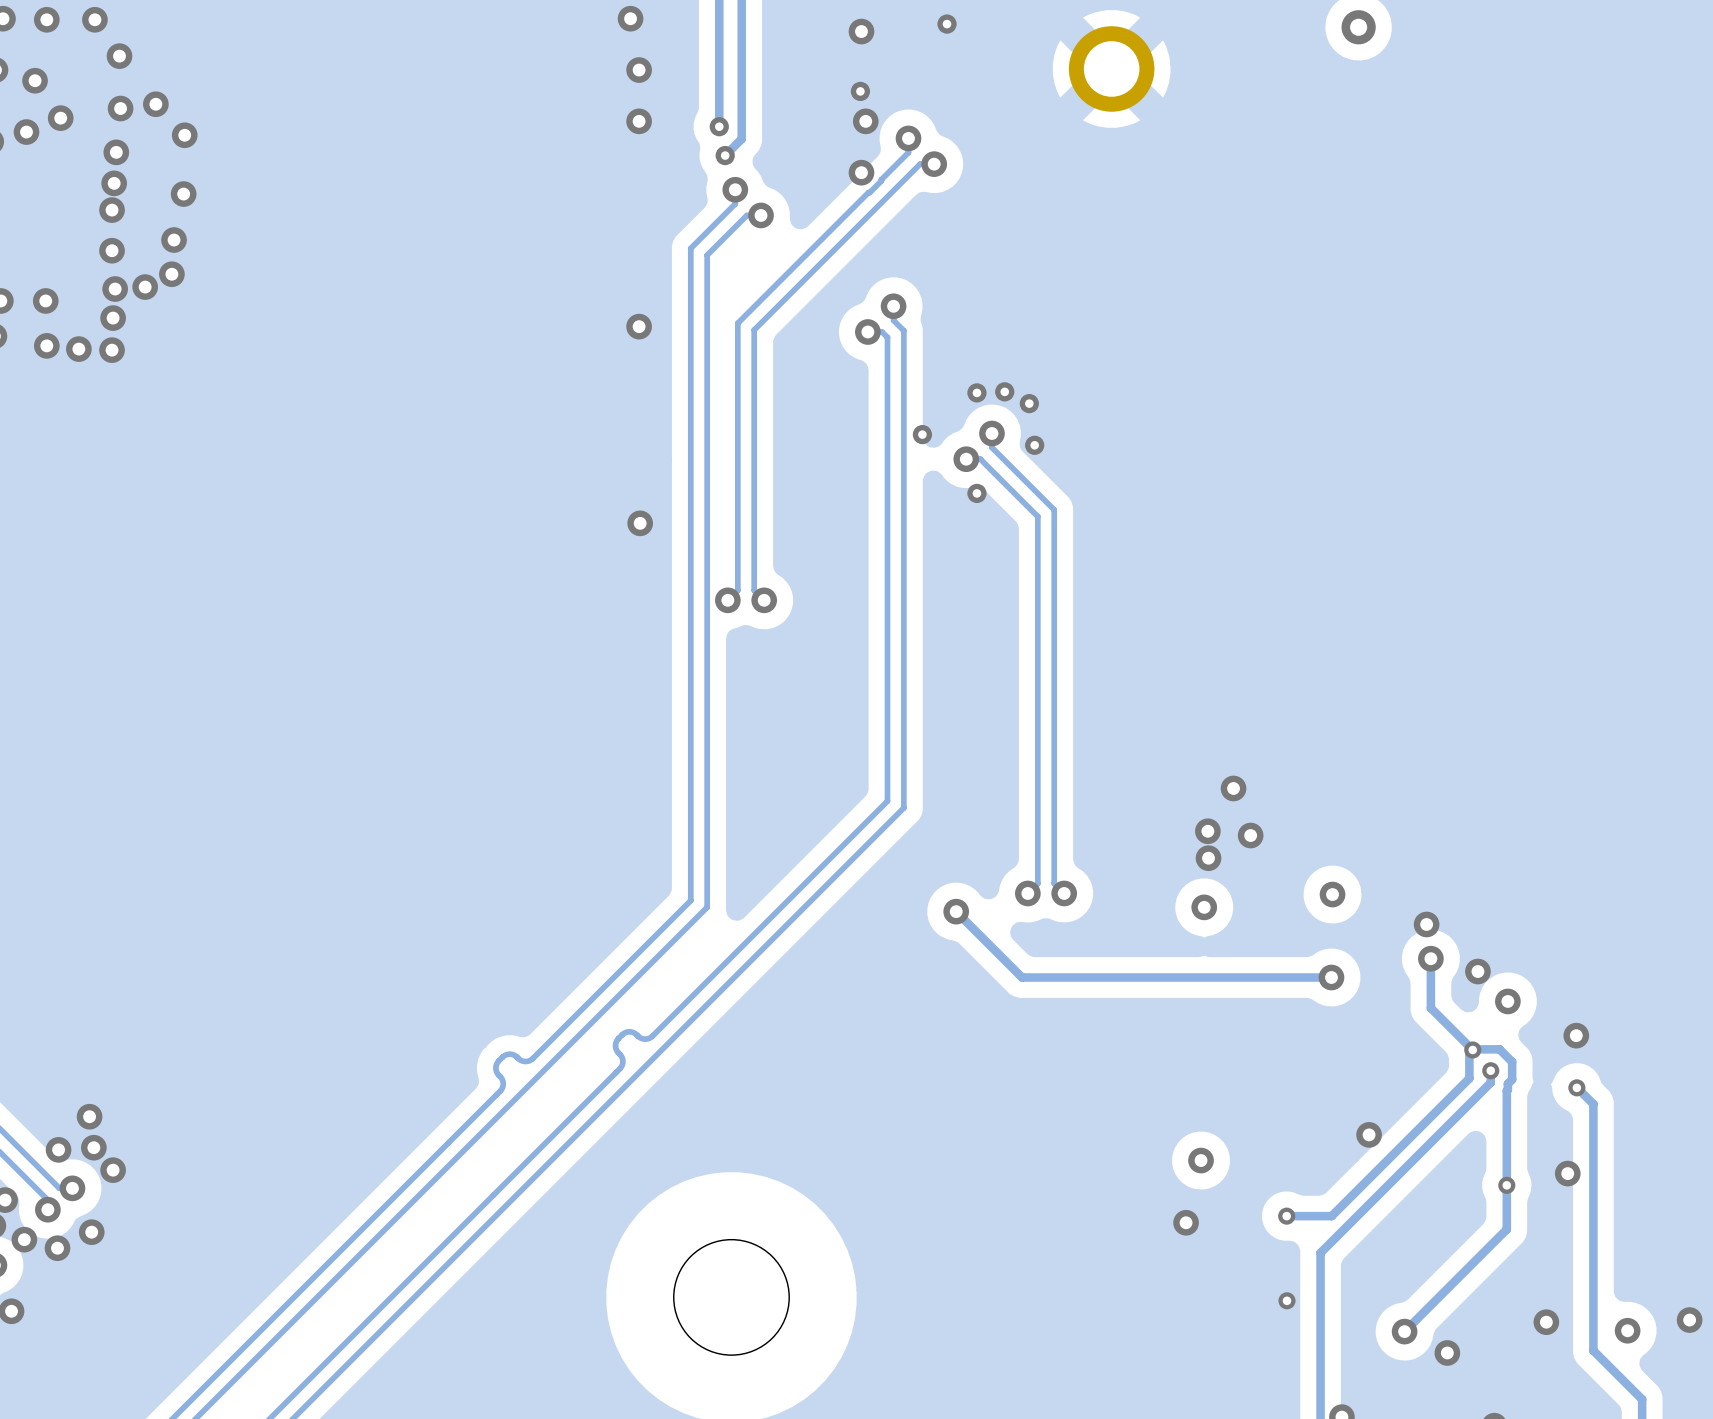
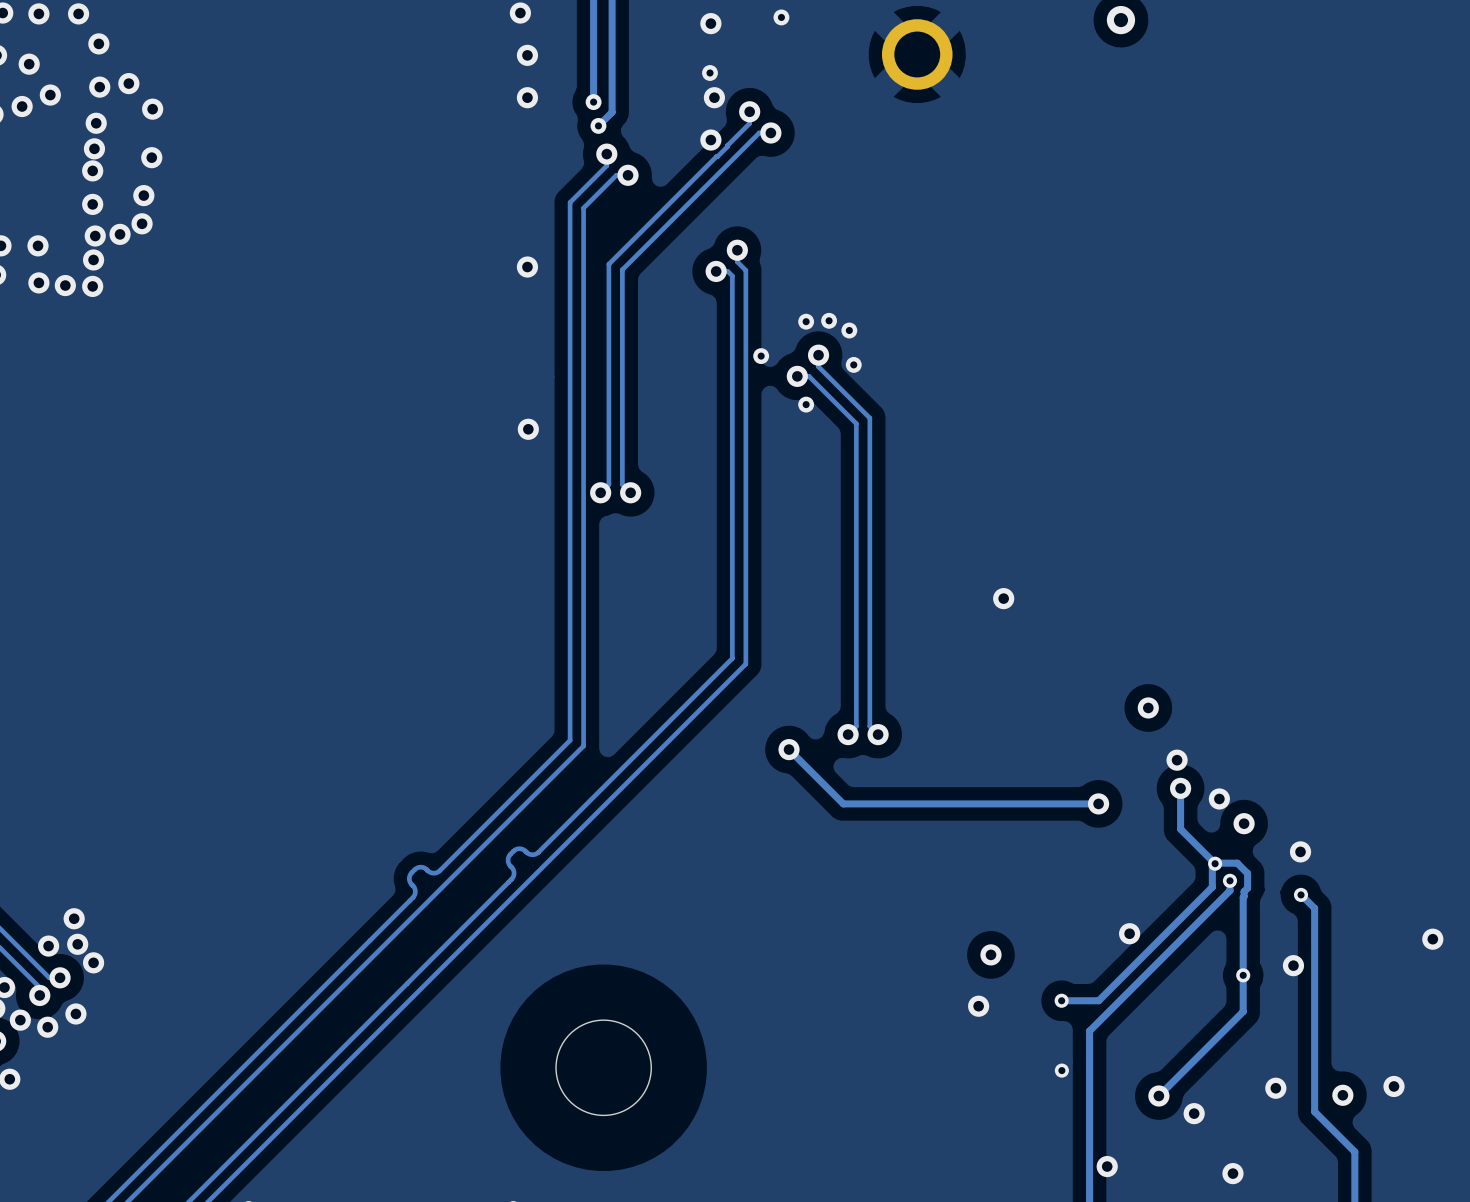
via: none -> (1003, 598)
via: (1233, 788) -> none
via: (1207, 831) -> none
via: (1250, 835) -> none
via: (1208, 858) -> none
via position: (1332, 894) -> (1148, 707)
via: (1204, 907) -> none

